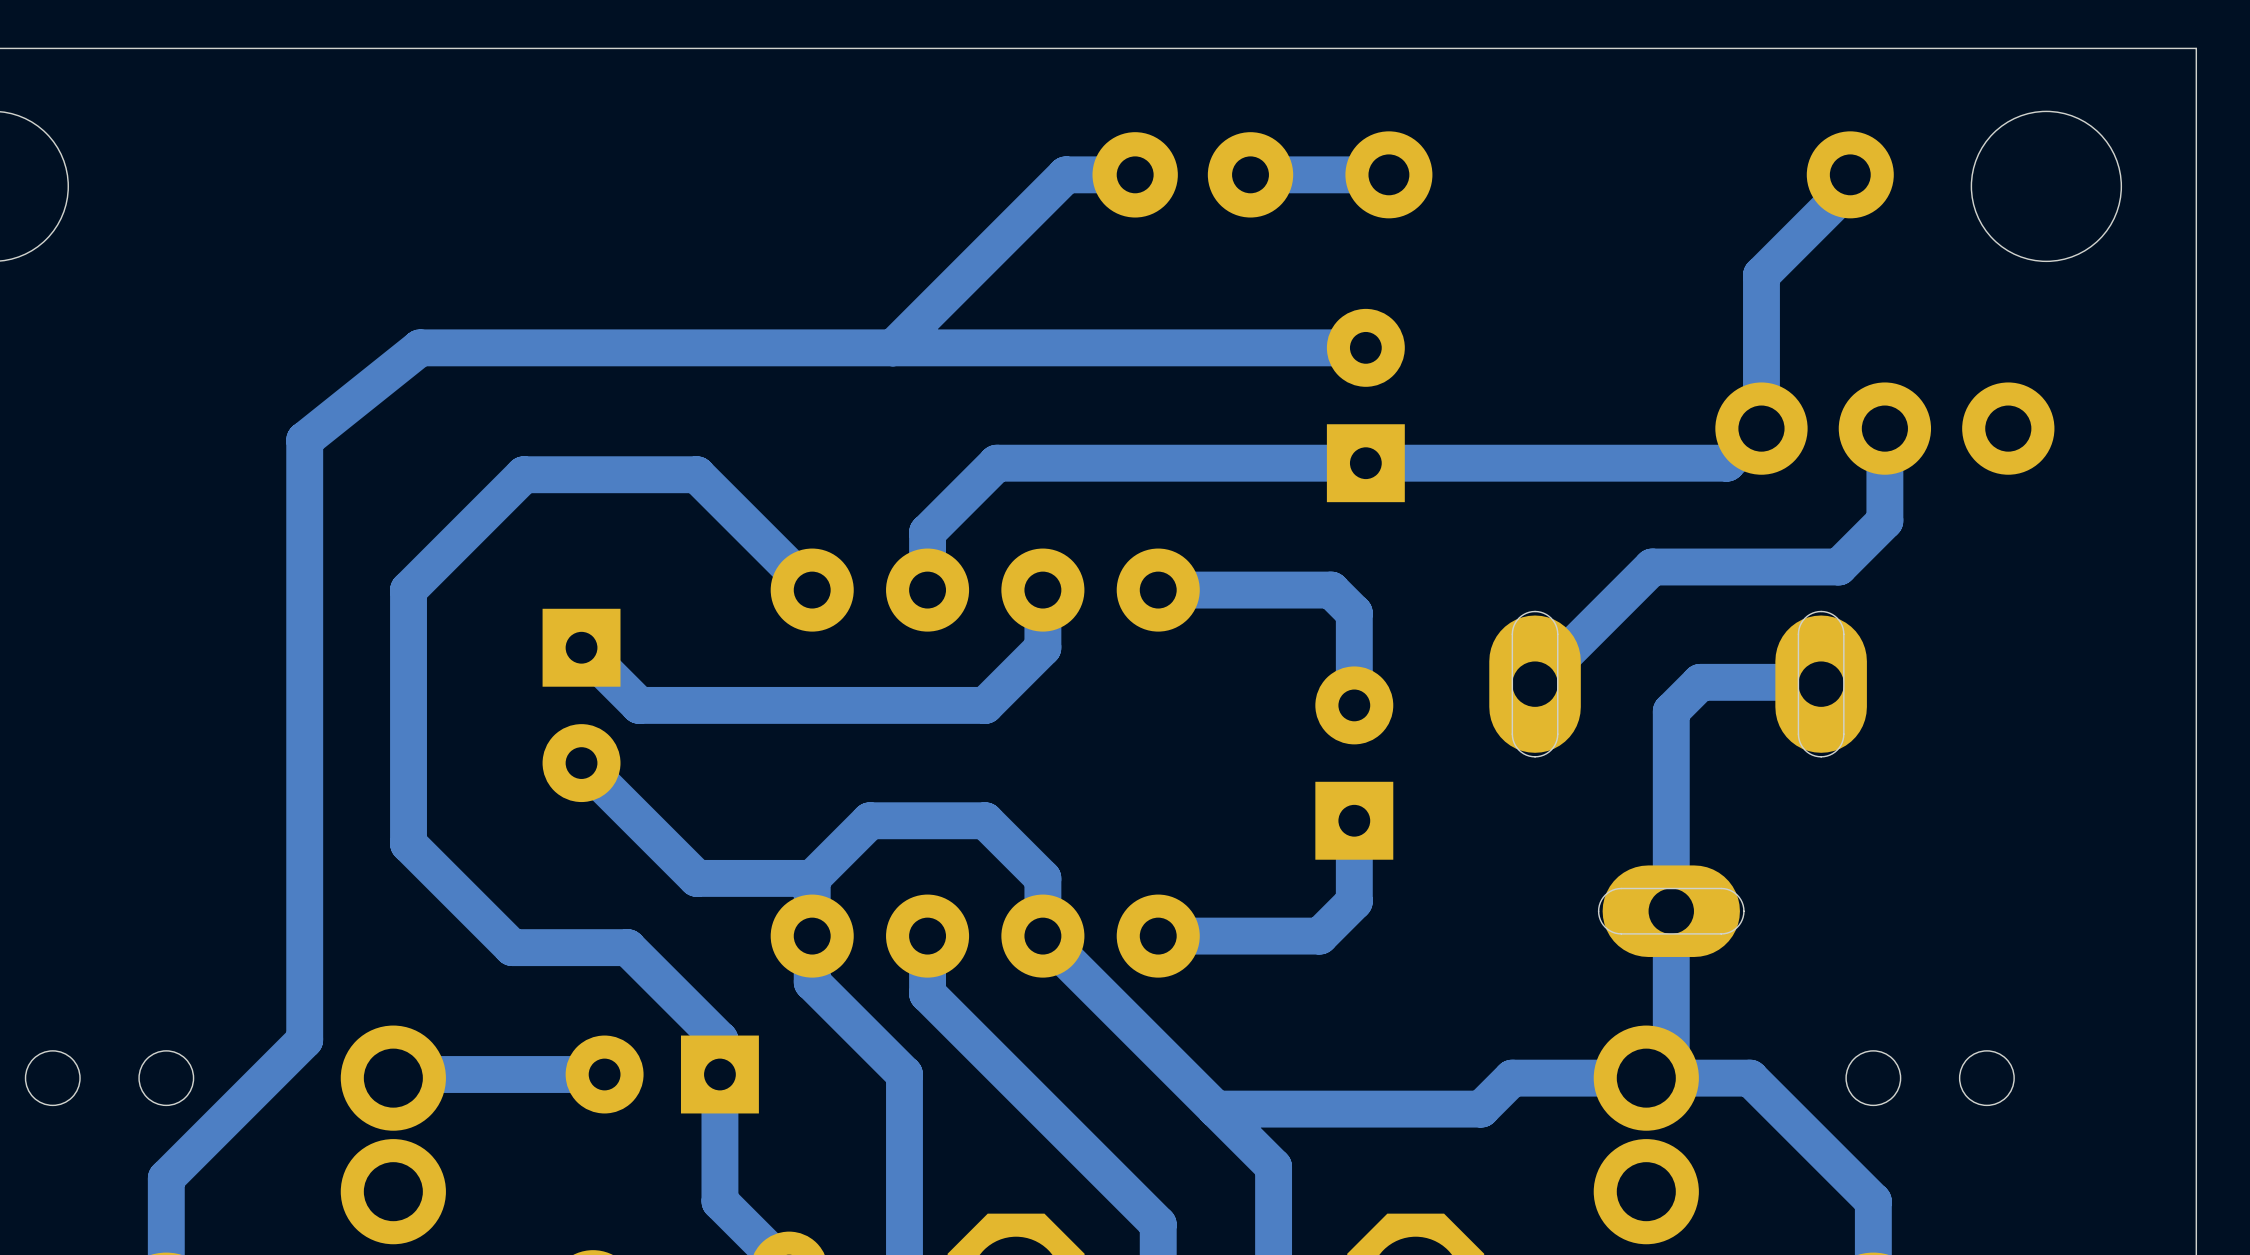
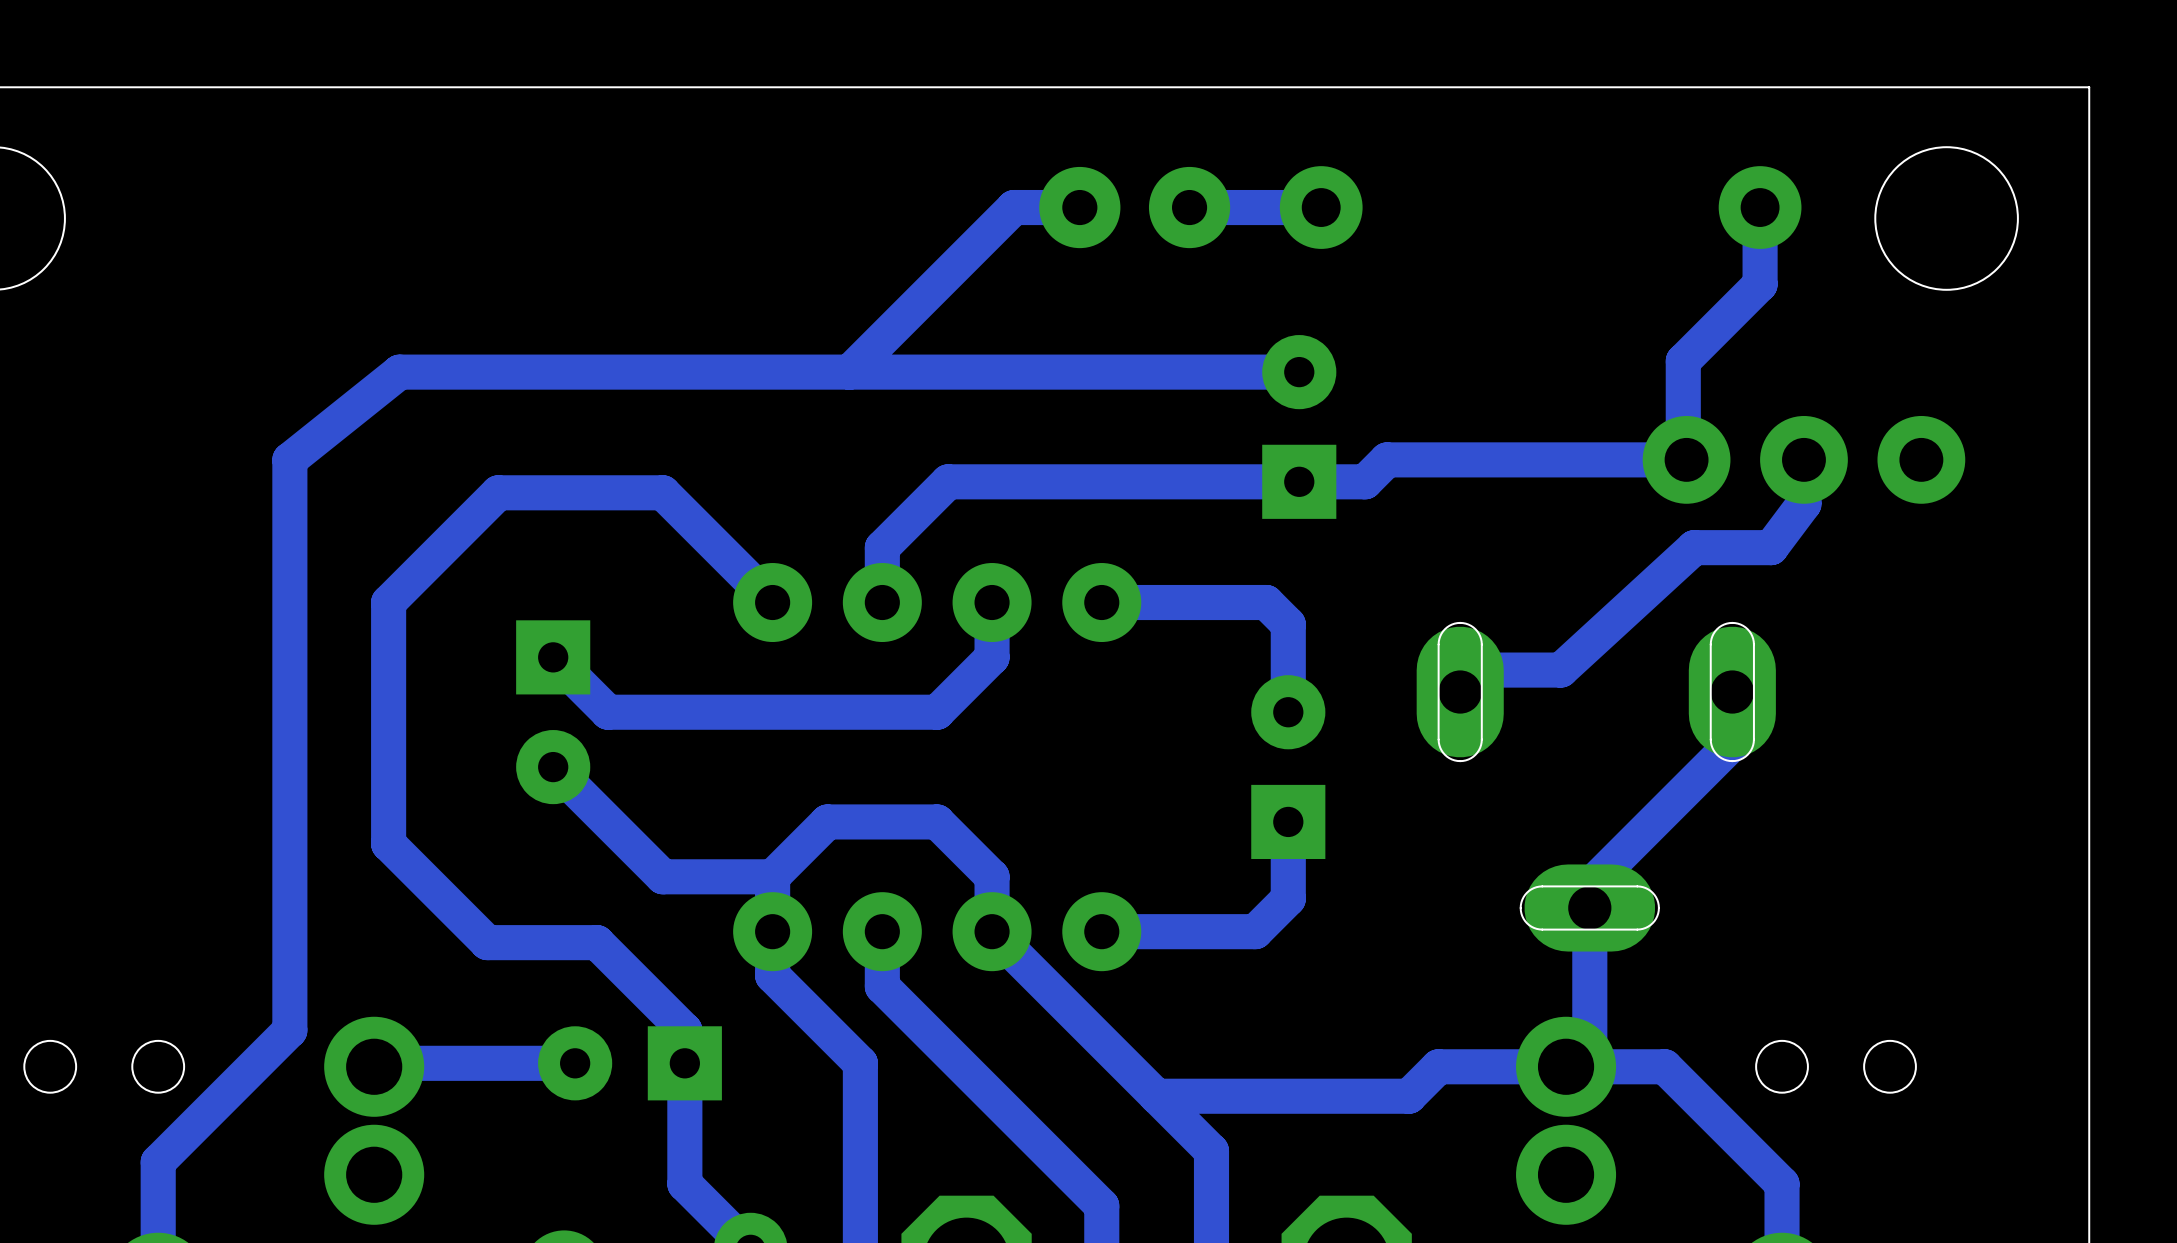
track: (1850, 186) (1761, 275) (1761, 428) (1726, 463) (1435, 463) -> (1686, 459) (1387, 459) (1365, 481)
track: none -> (1760, 218) (1760, 284) (1683, 361) (1683, 459)
track: (1884, 428) (1884, 520) (1838, 567) (1652, 567) (1535, 684) -> none
part position: (1884, 428) -> (1803, 459)
track: none -> (1803, 459) (1803, 503) (1771, 547) (1694, 547) (1560, 670) (1460, 670)
track: (1821, 684) (1819, 682) (1700, 682) (1671, 711) (1671, 888) -> (1732, 670) (1732, 743) (1589, 886)

